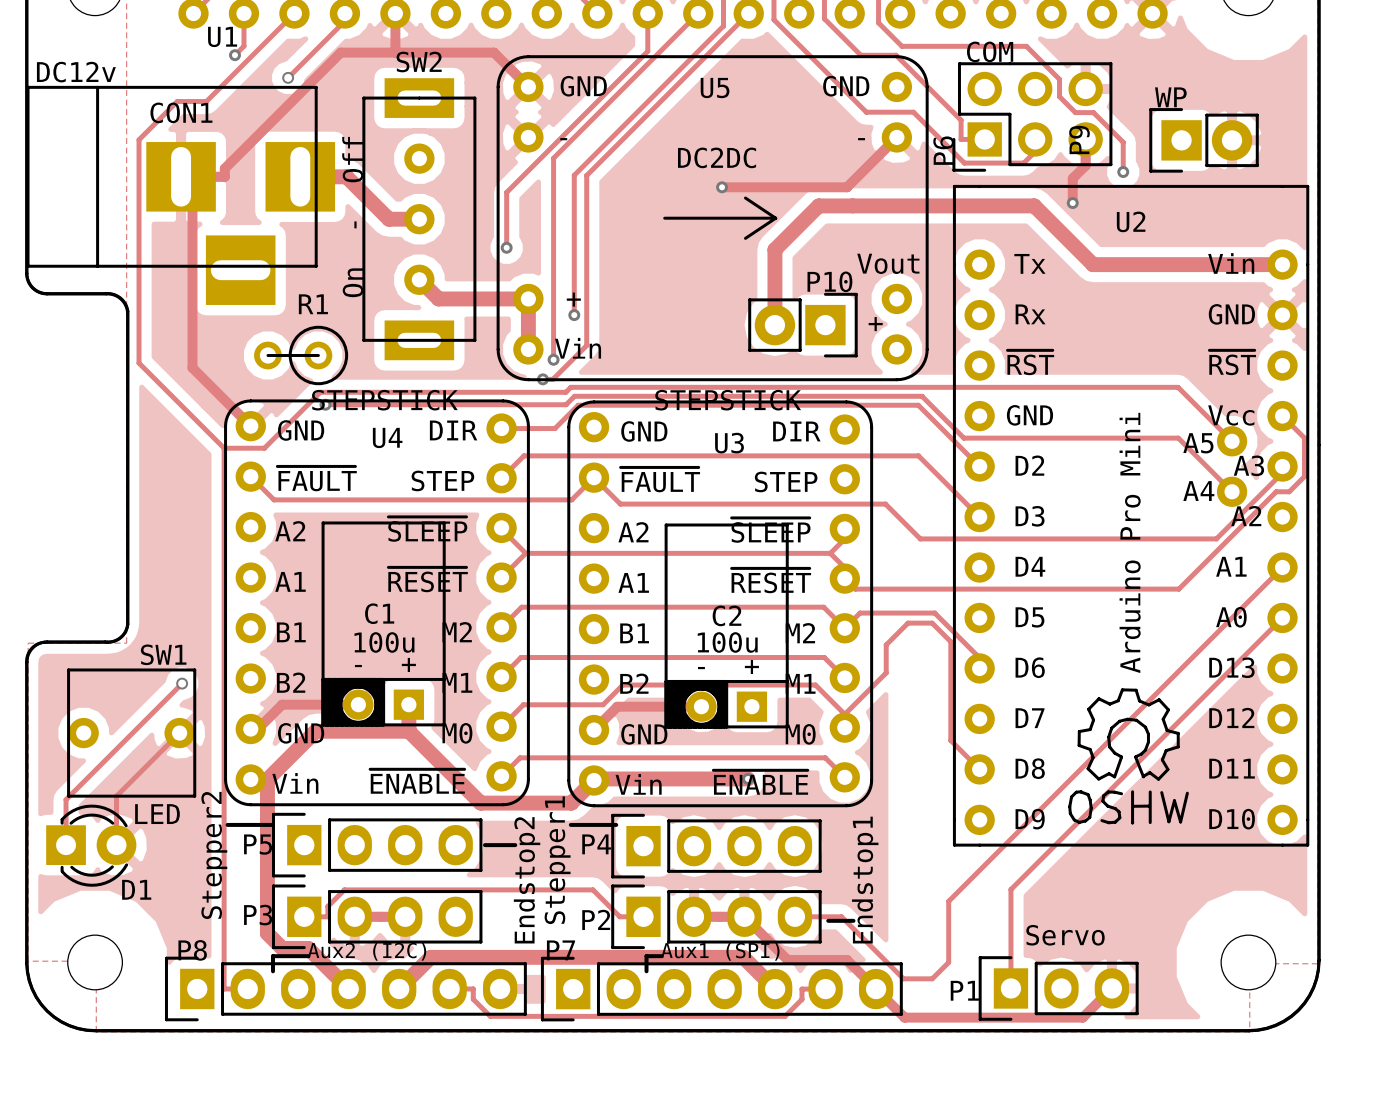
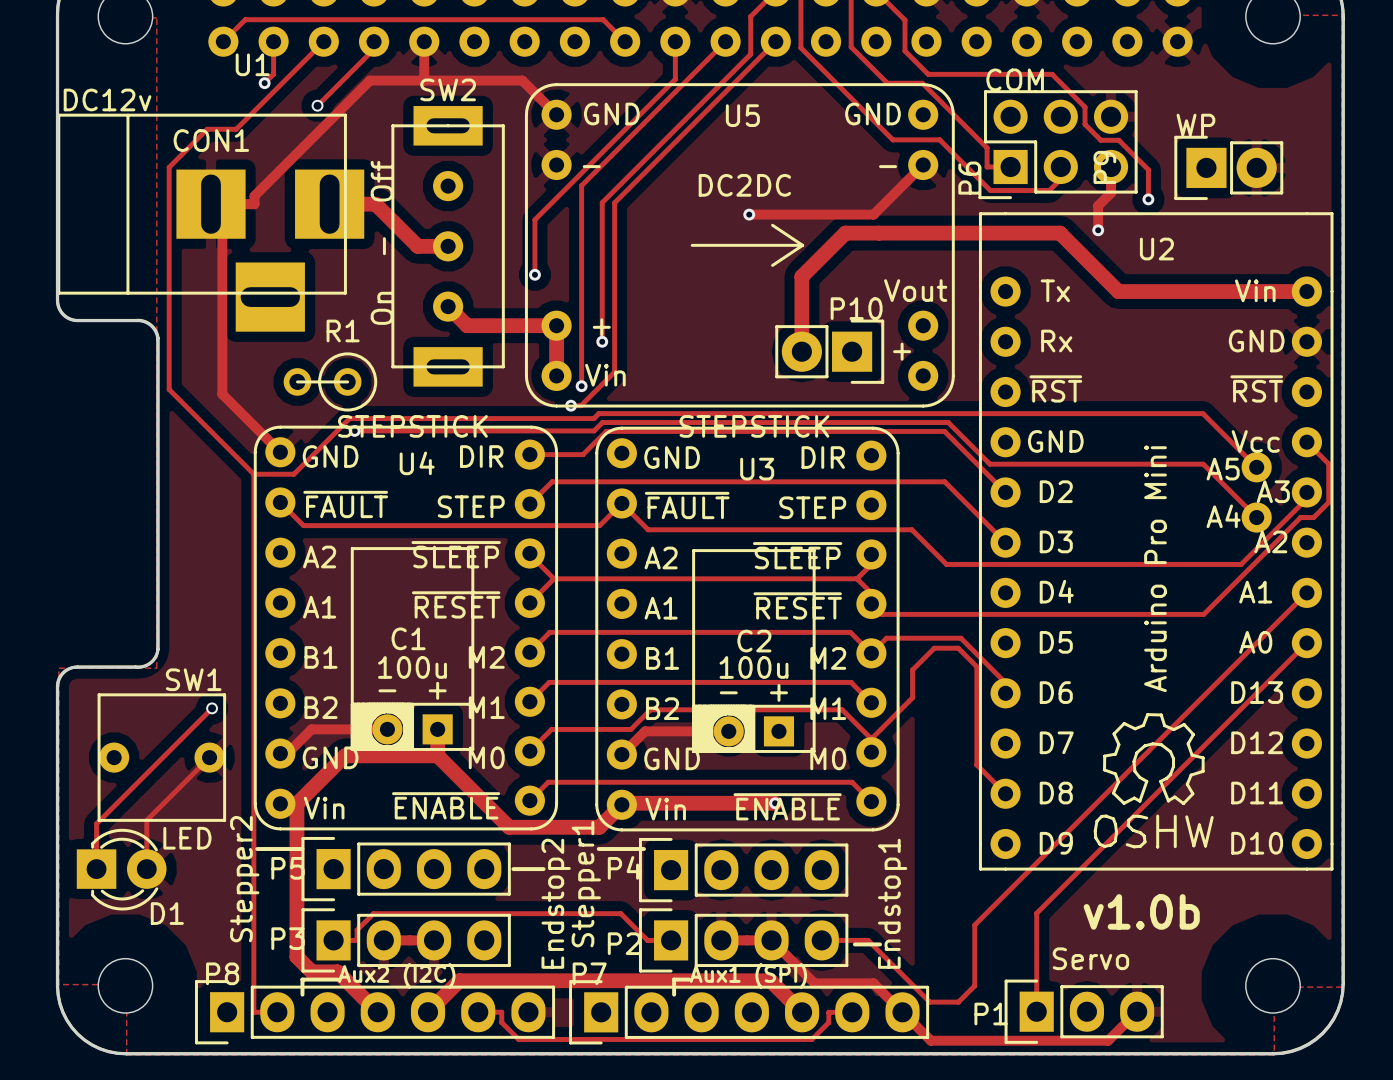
text: none -> v1.0b (1141, 911)

